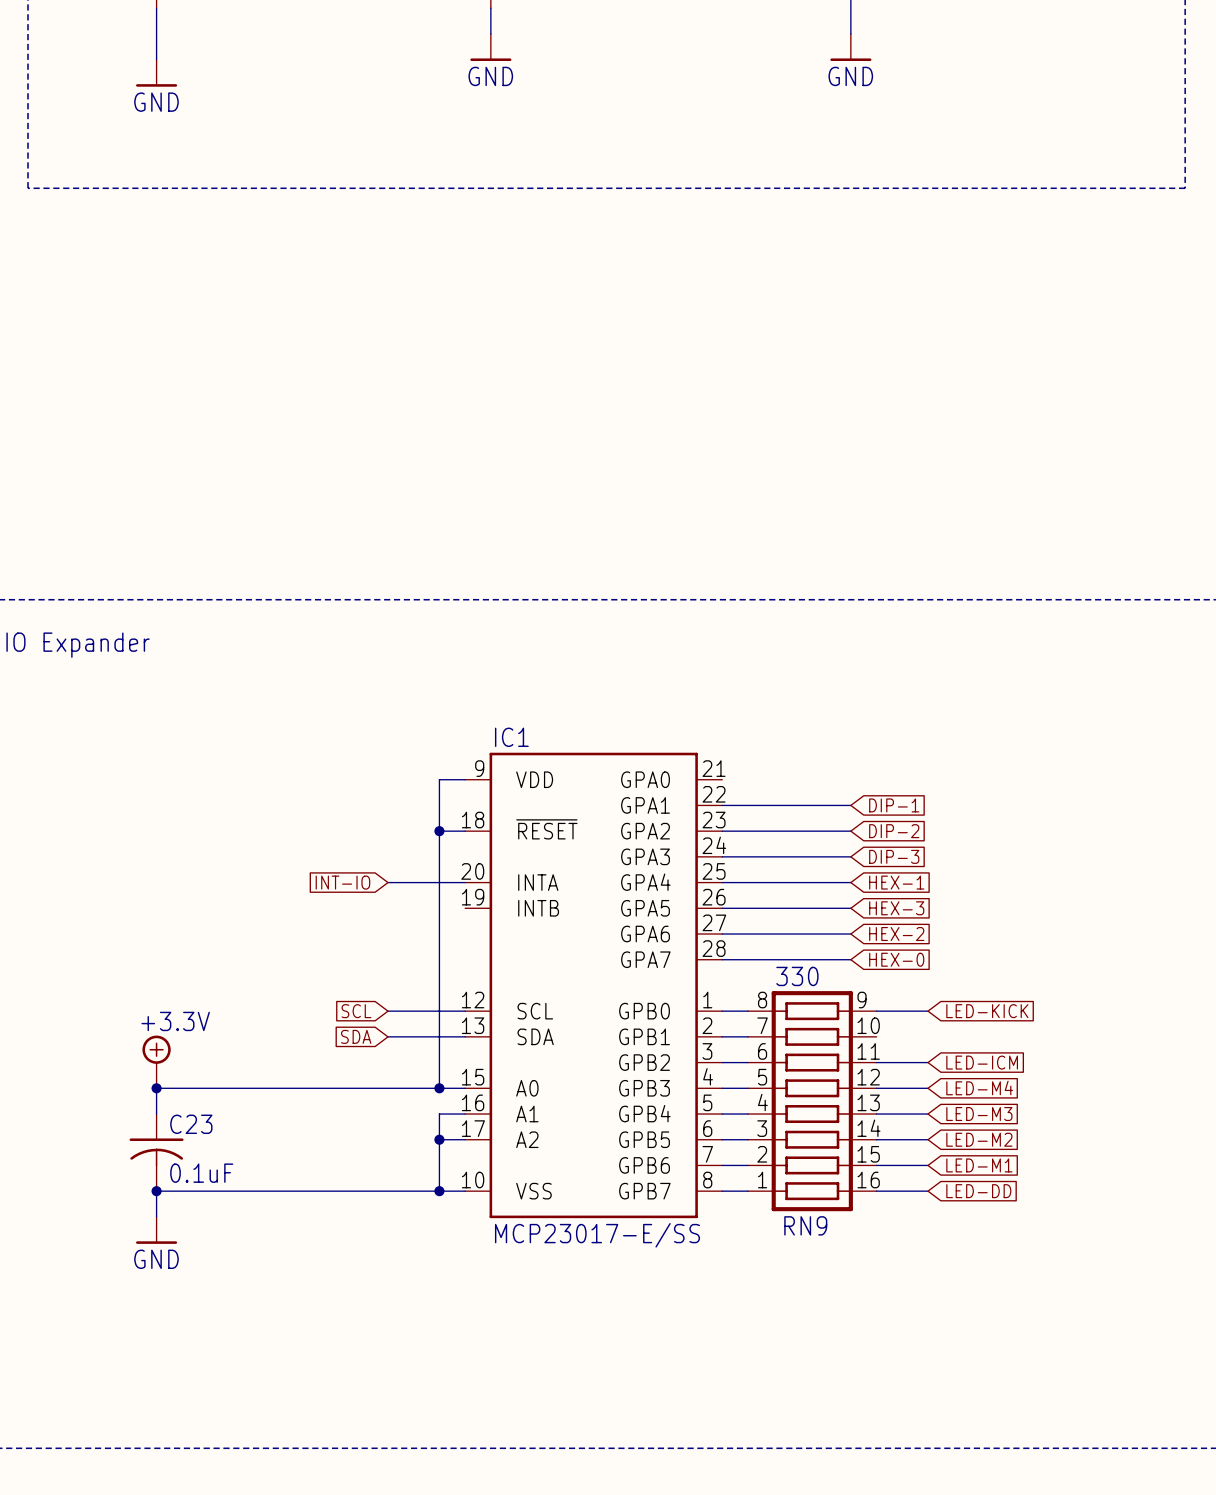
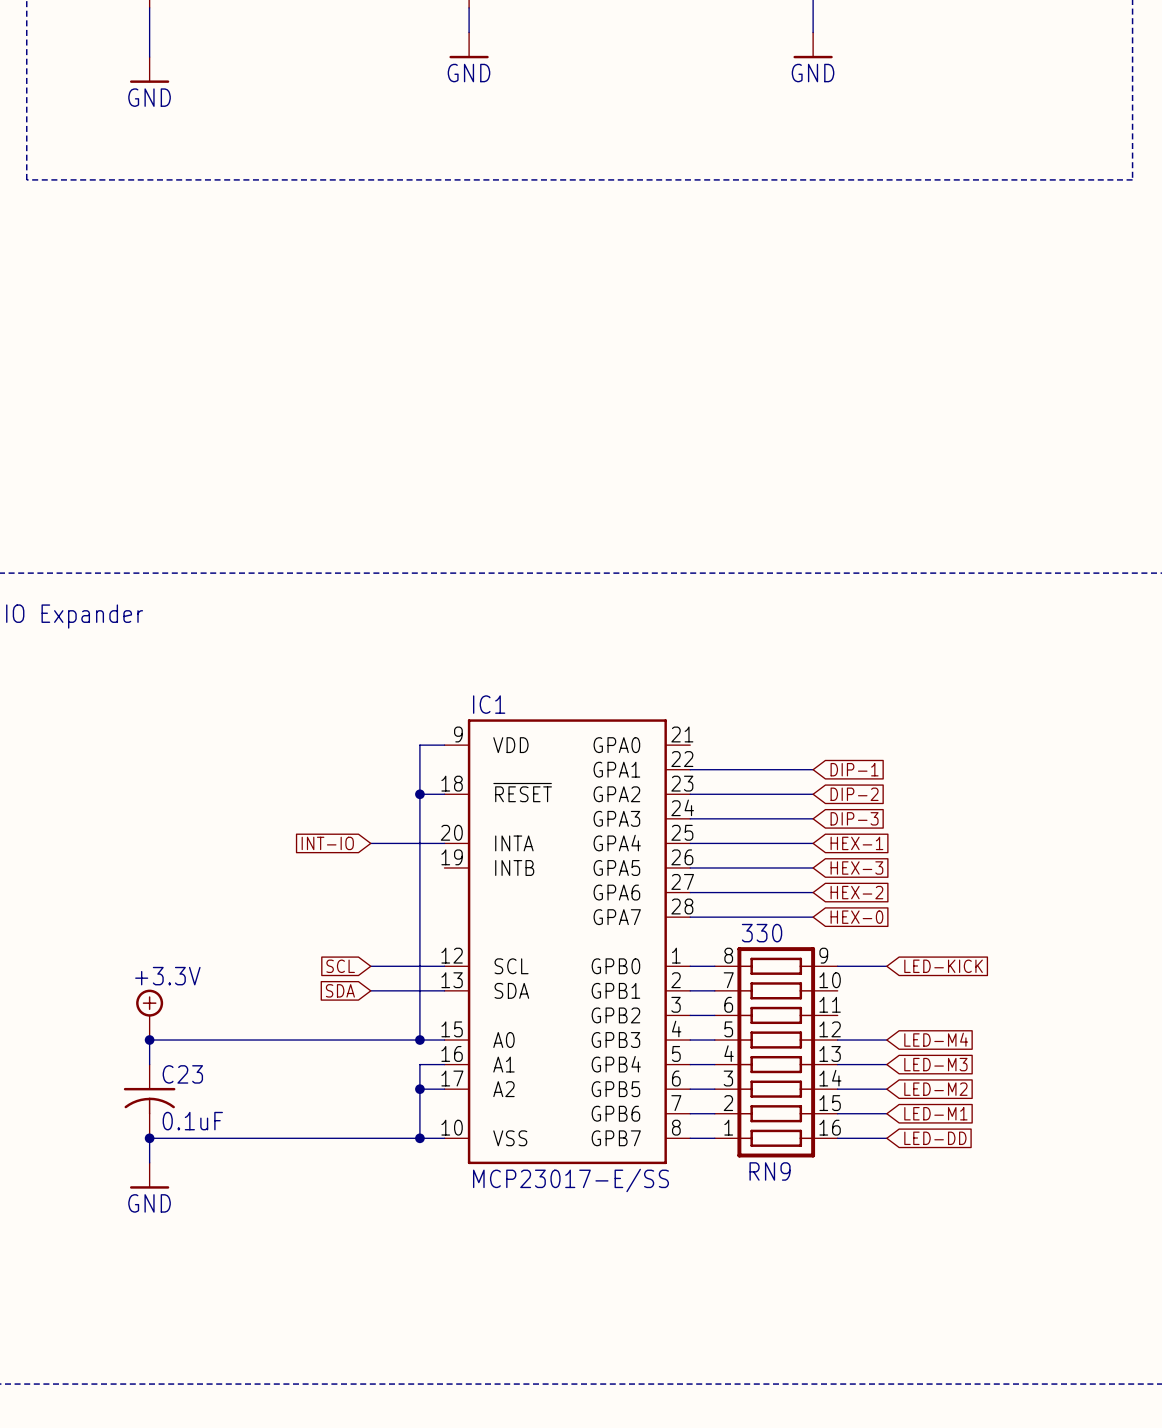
wire: (876, 1062) (928, 1062) -> none
global label: LED-ICM (982, 1062) -> none

